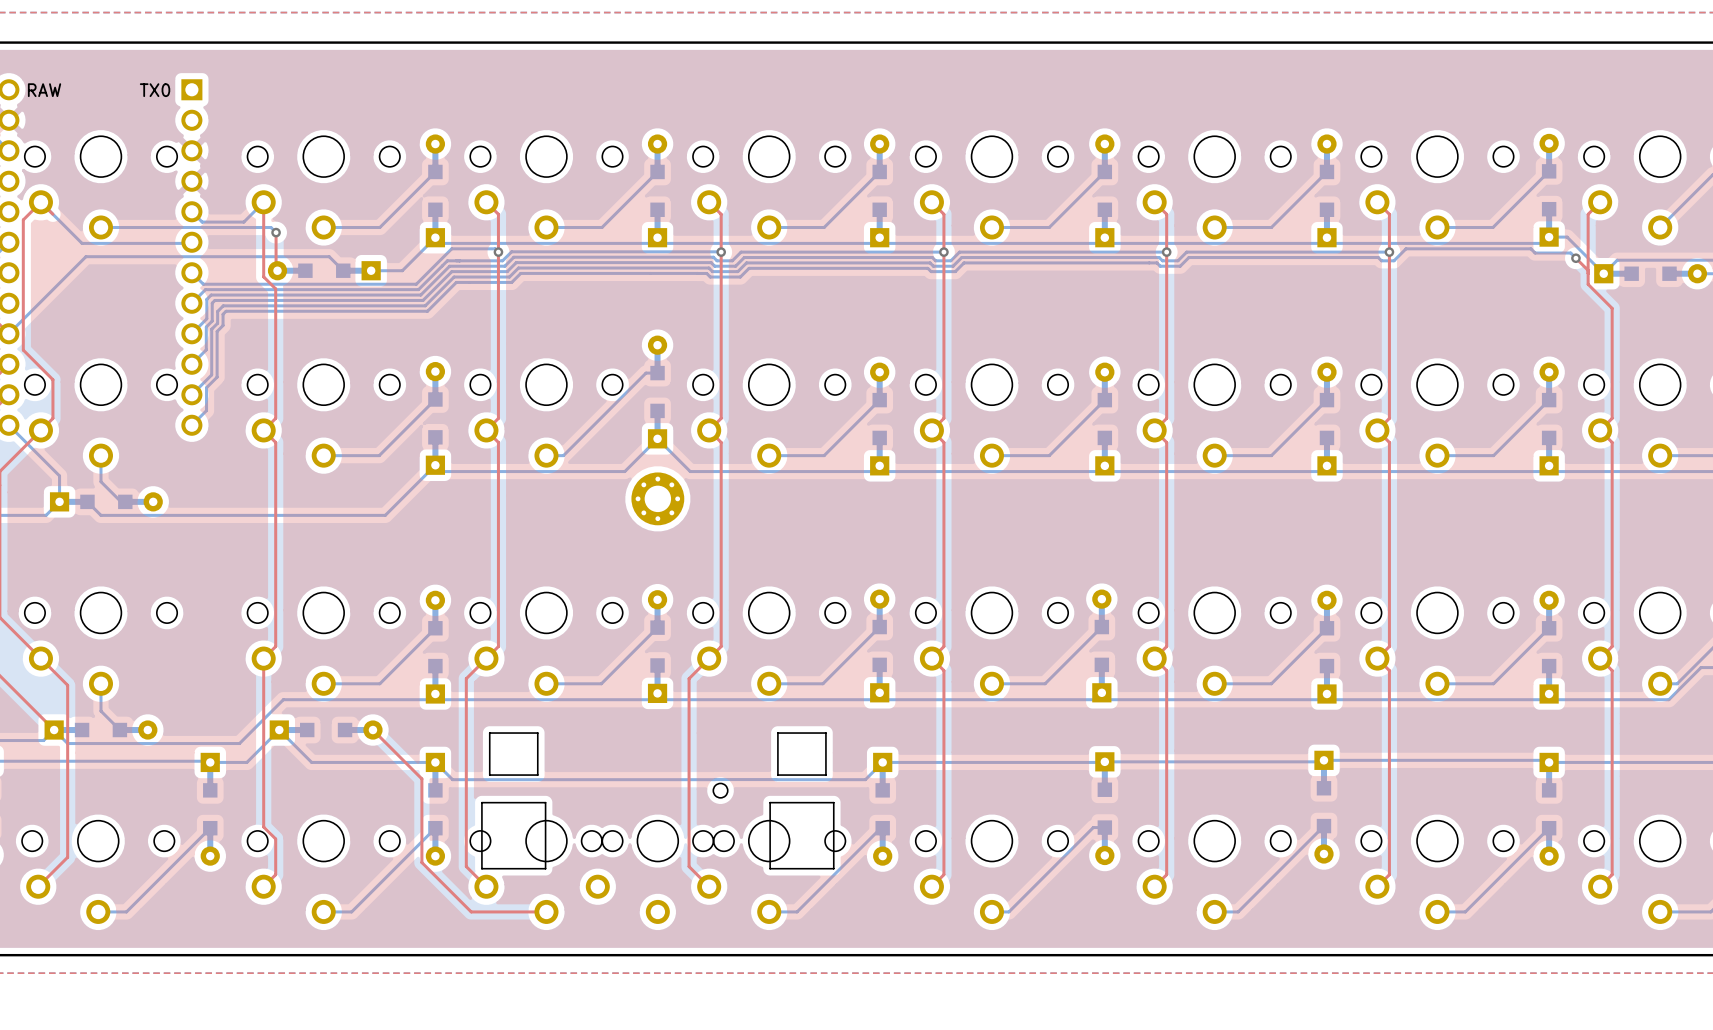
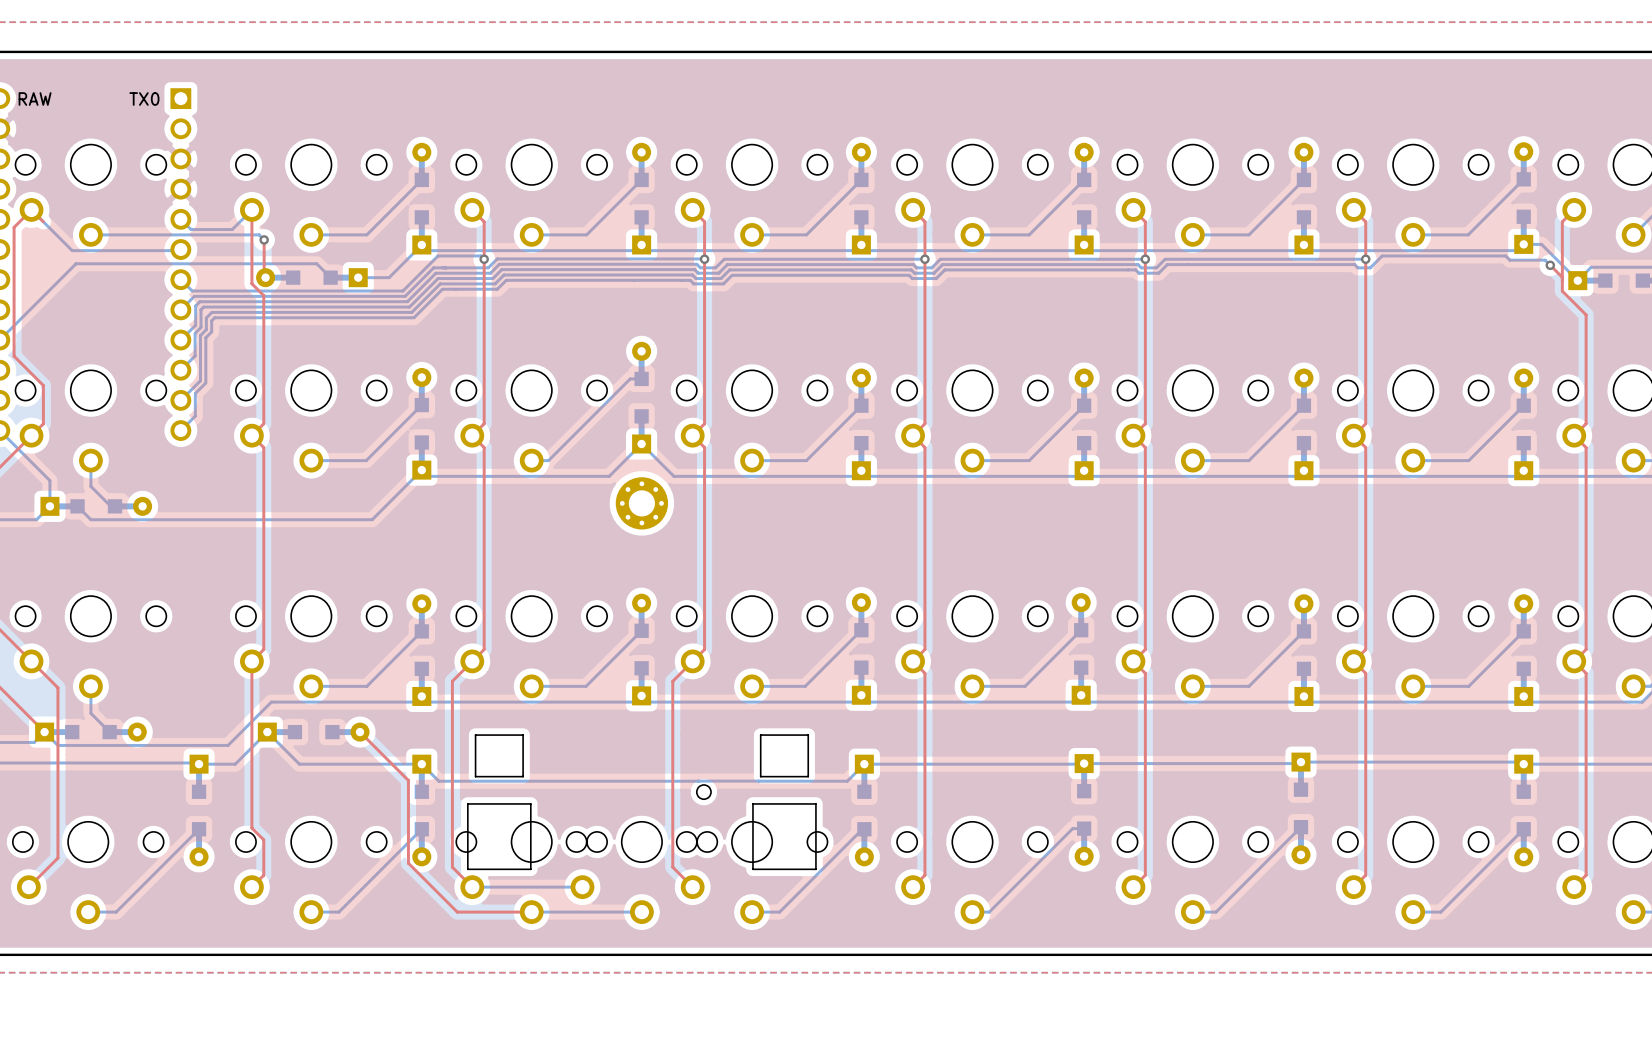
bottom track: none -> (472, 887) (582, 887)
bottom track: none -> (531, 912) (641, 912)

